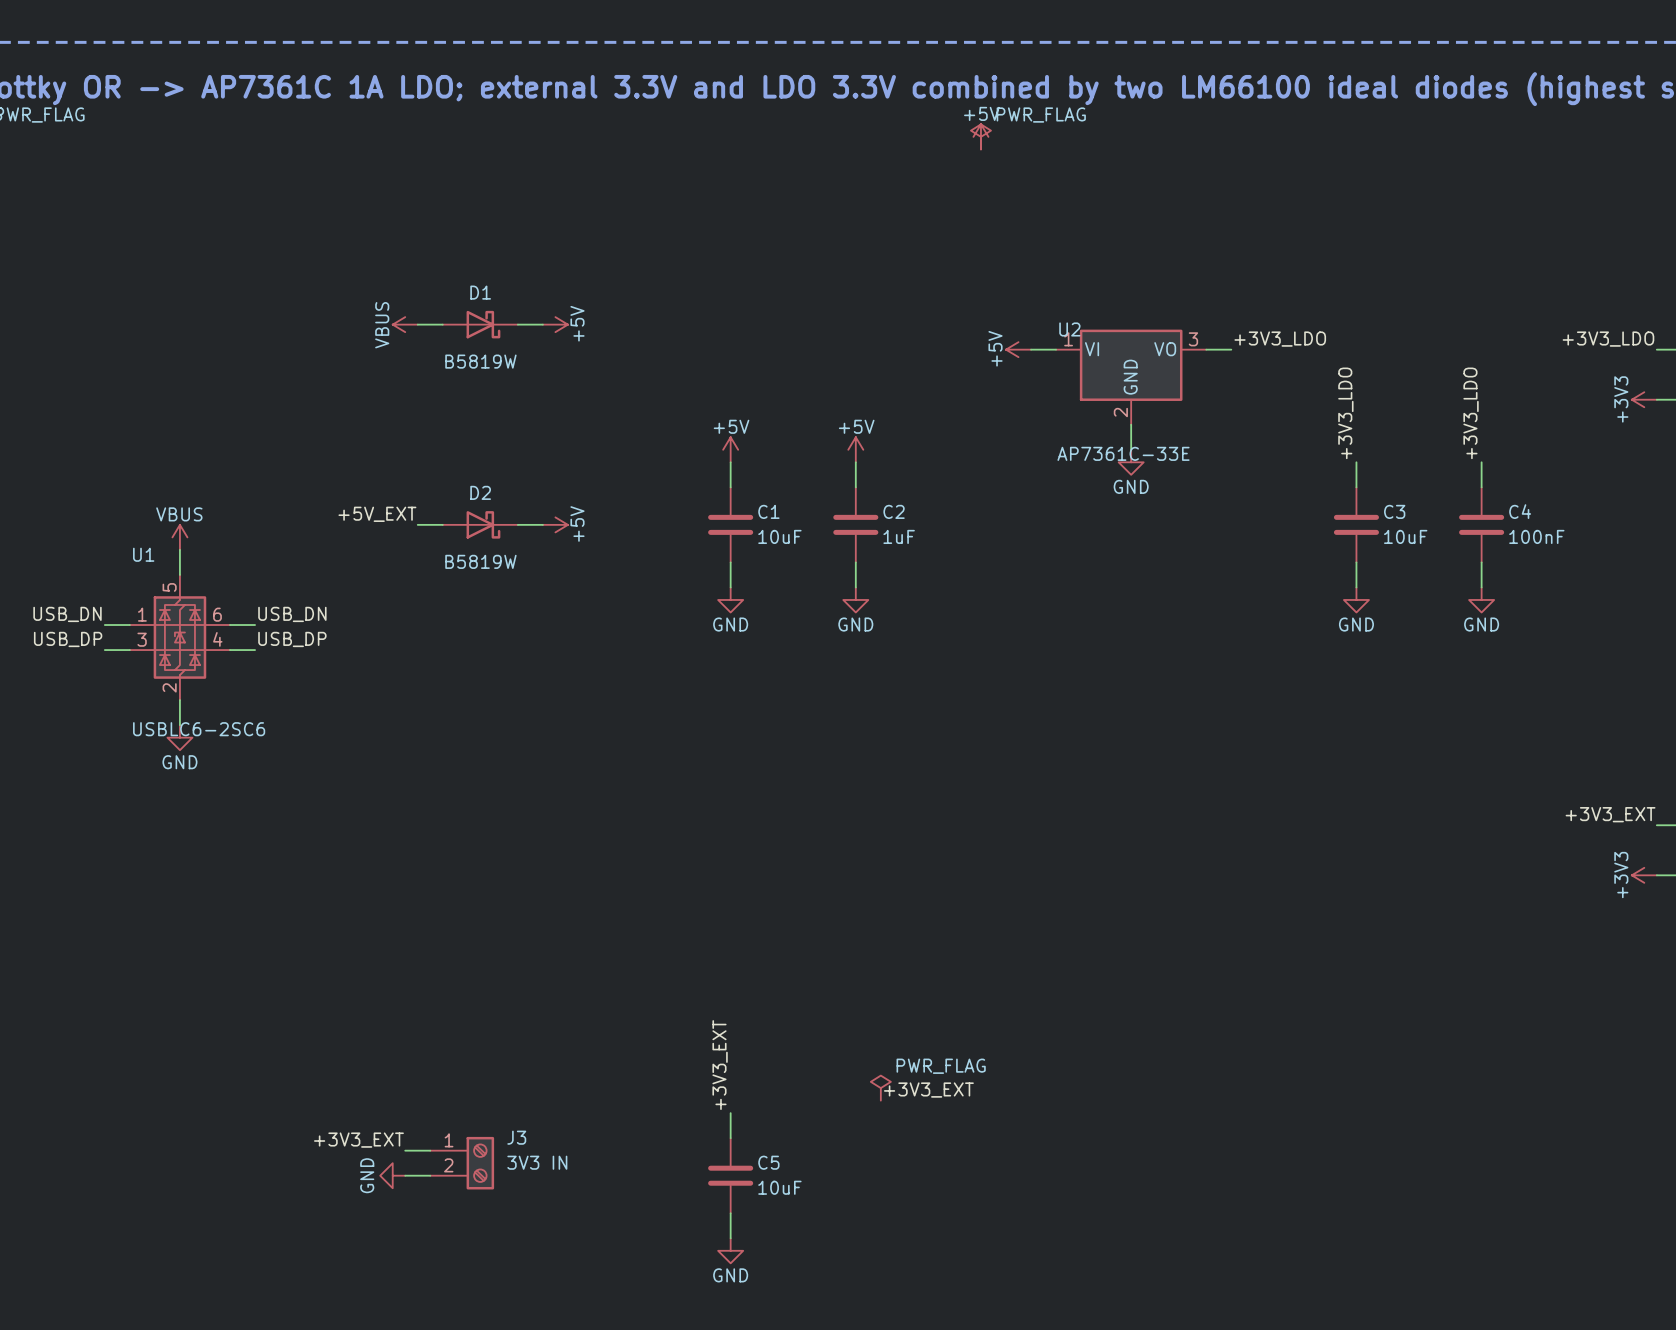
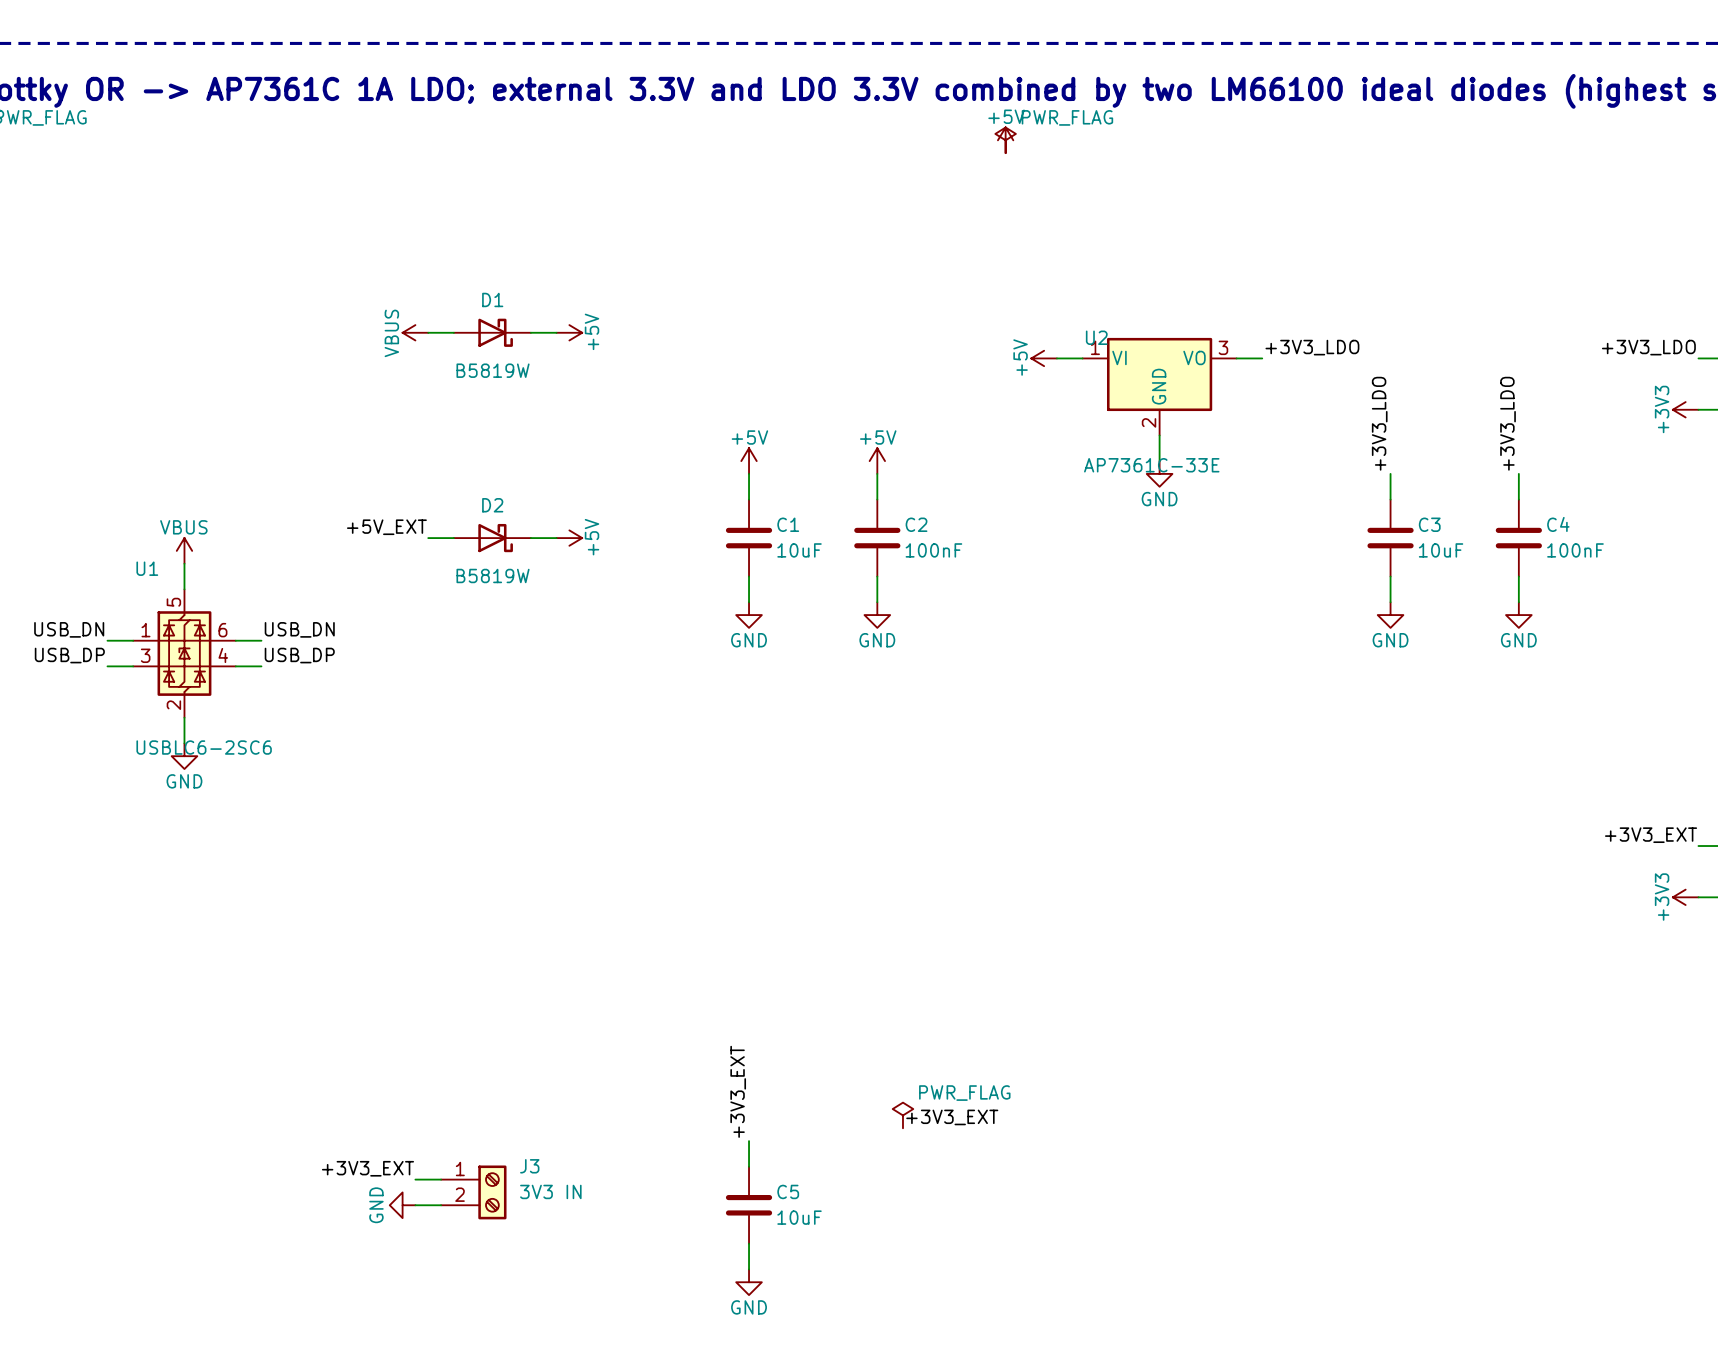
C2 value: 1uF (899, 536) -> 100nF (933, 550)

